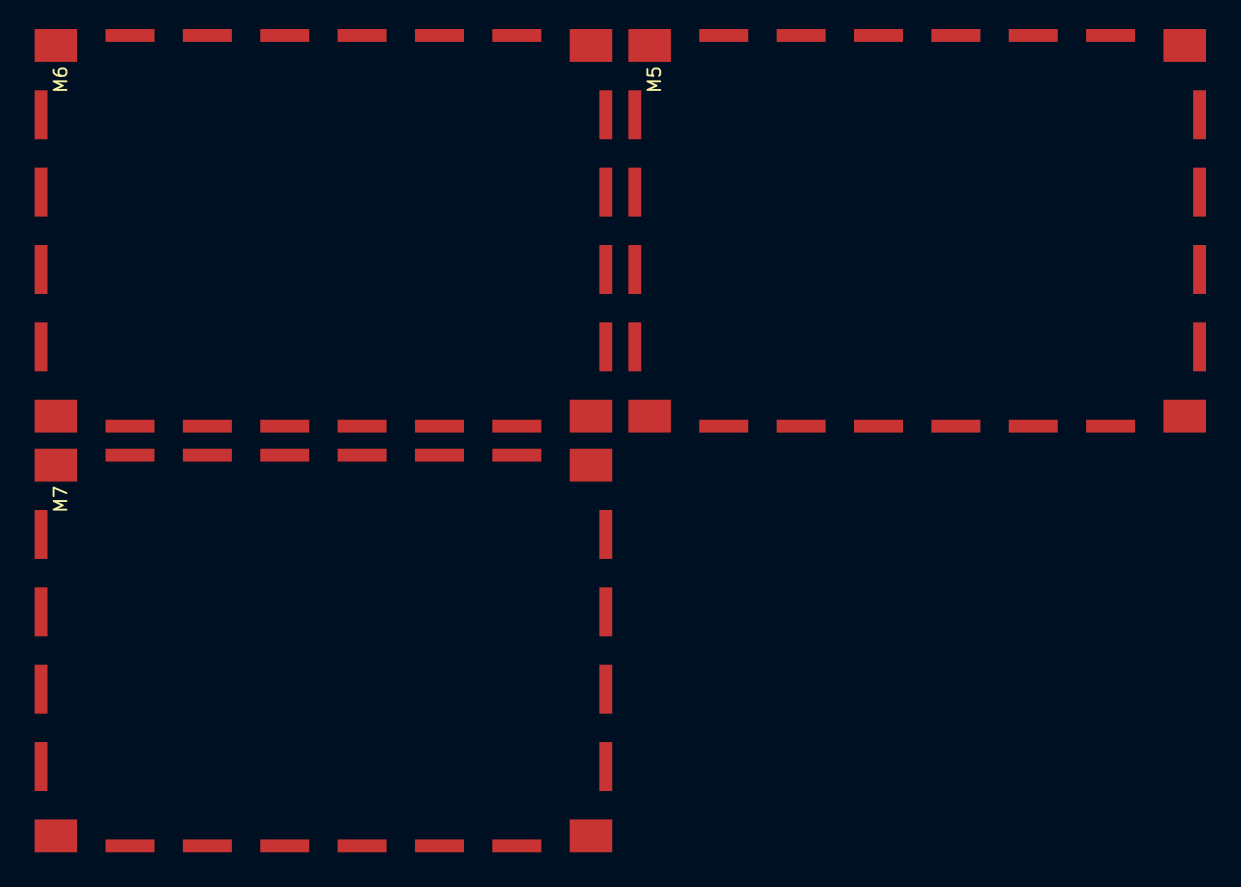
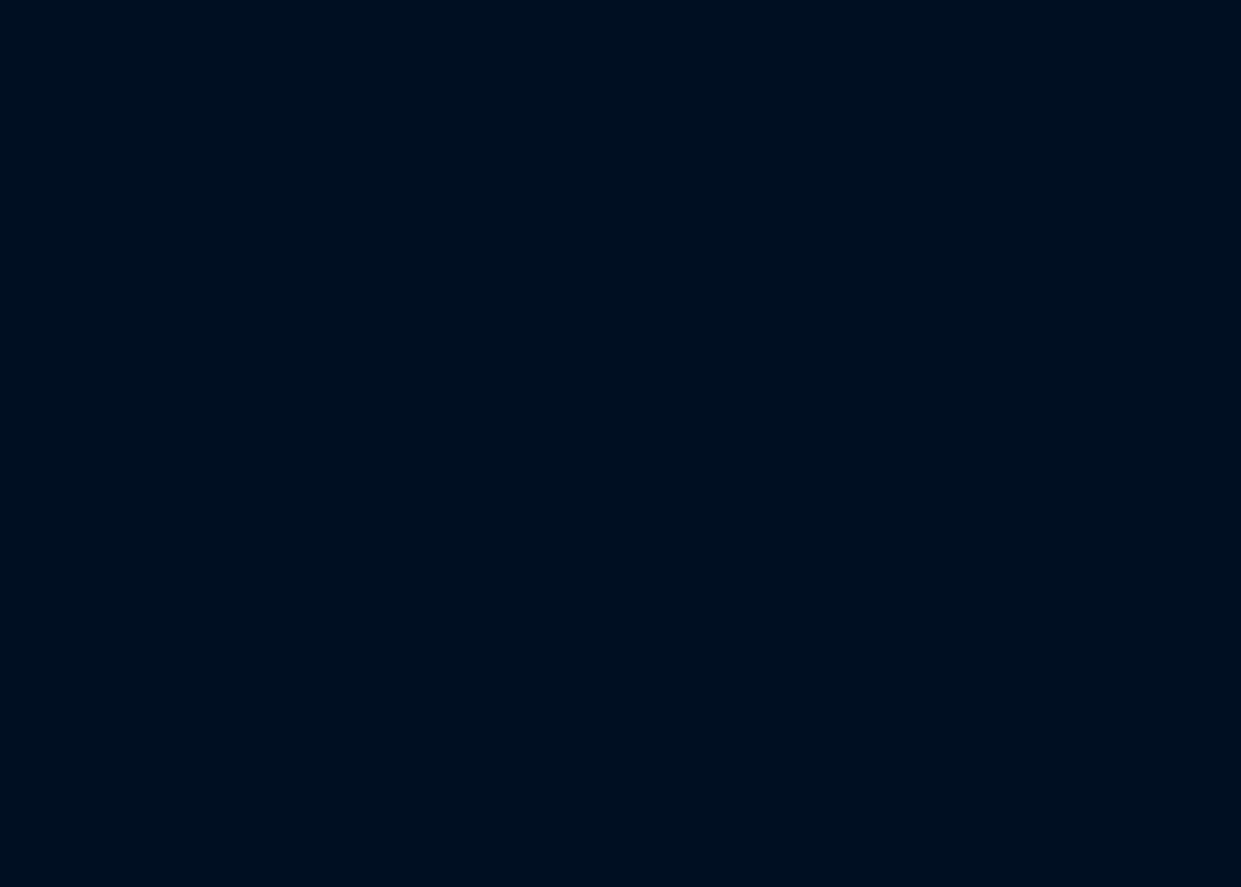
M6: (323, 230) -> none
M5: (917, 230) -> none
M7: (323, 650) -> none

